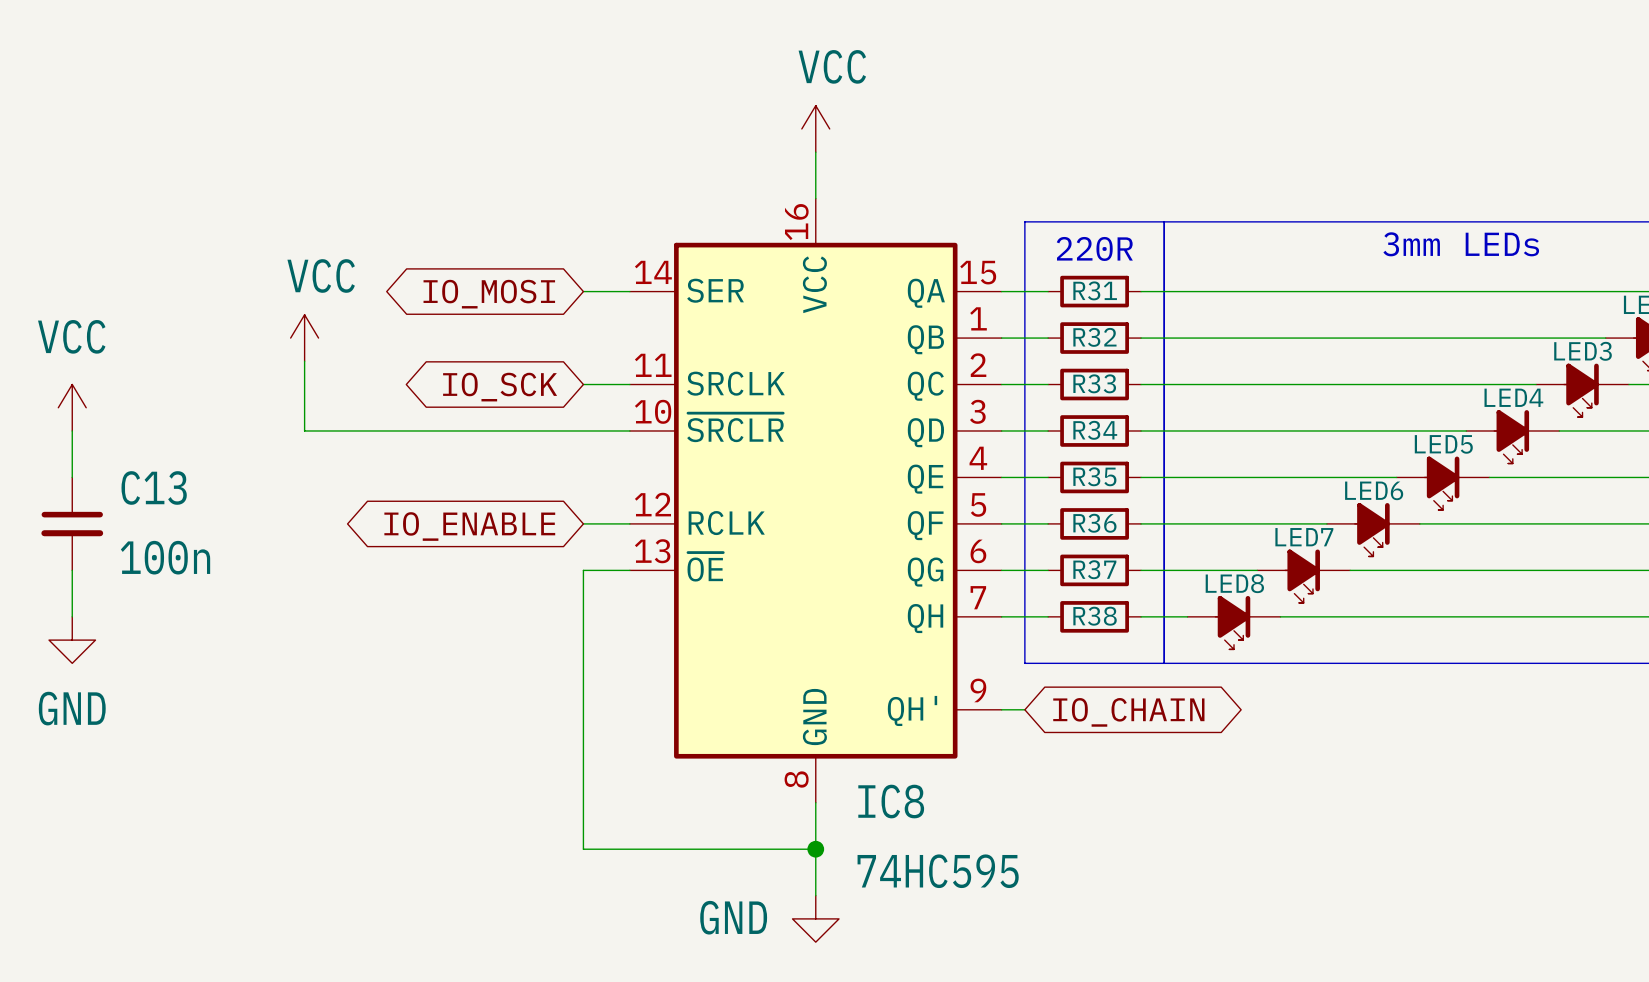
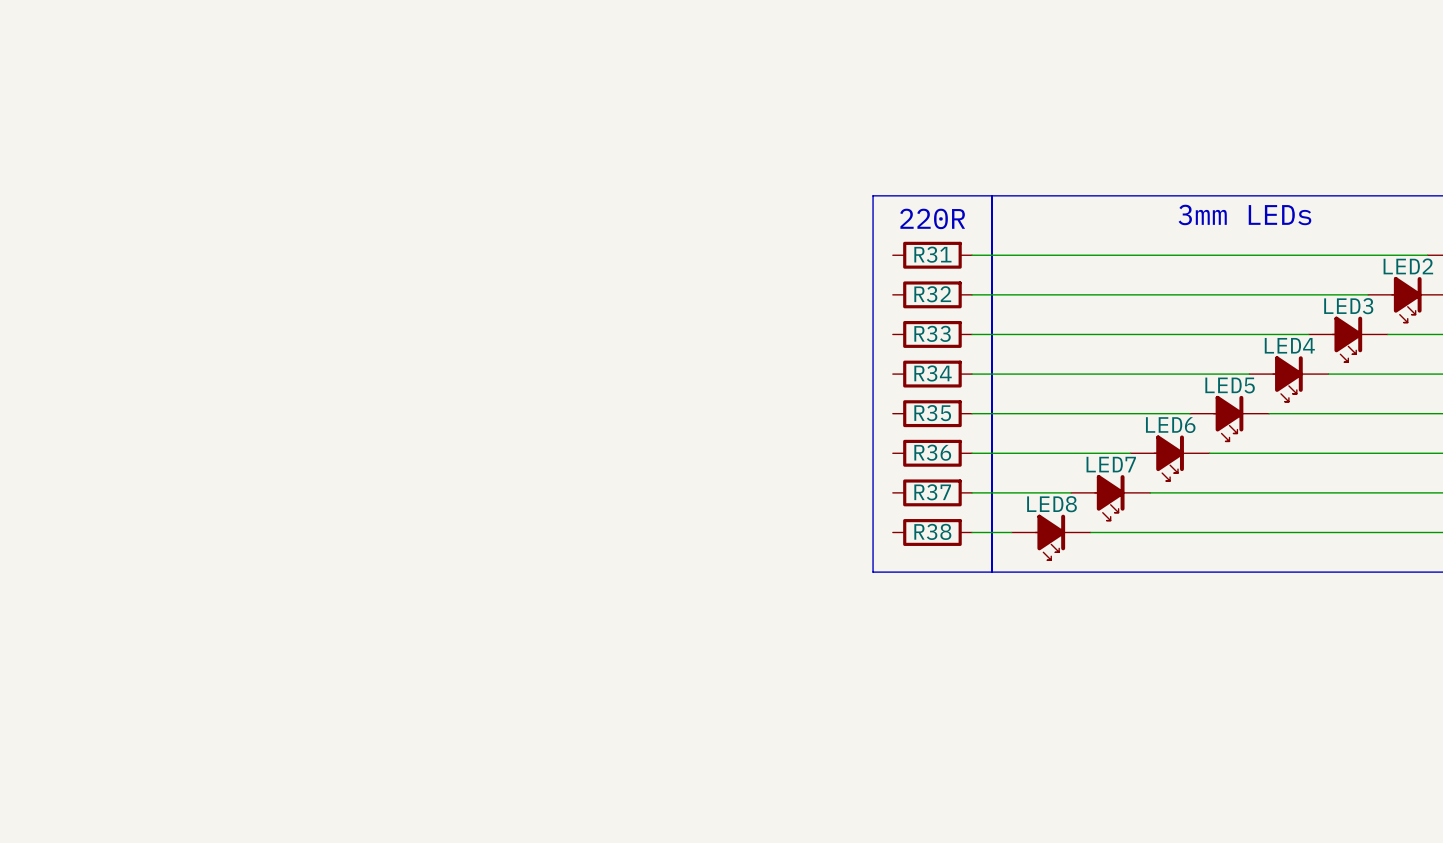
power symbol: VCC (815, 128) -> none
wire: (815, 152) (815, 198) -> none
wire: (583, 291) (629, 291) -> none
wire: (1001, 291) (1048, 291) -> none
global label: IO_MOSI (489, 294) -> none
power symbol: VCC (304, 338) -> none
wire: (1001, 338) (1048, 338) -> none
wire: (304, 361) (304, 430) (629, 430) -> none
wire: (583, 384) (629, 384) -> none
wire: (1001, 384) (1048, 384) -> none
global label: IO_SCK (500, 387) -> none
power symbol: VCC (72, 407) -> none
wire: (72, 430) (72, 477) -> none
wire: (1001, 430) (1048, 430) -> none
wire: (1001, 477) (1048, 477) -> none
IC8: 74HC595 (815, 500) -> none
C13: 100n (72, 523) -> none
wire: (583, 523) (629, 523) -> none
wire: (1001, 523) (1048, 523) -> none
global label: IO_ENABLE (469, 526) -> none
wire: (72, 570) (72, 616) -> none
wire: (629, 570) (583, 570) (583, 849) (815, 849) -> none
wire: (1001, 570) (1048, 570) -> none
wire: (1001, 616) (1048, 616) -> none
power symbol: GND (72, 640) -> none
wire: (1001, 709) (1024, 709) -> none
global label: IO_CHAIN (1128, 712) -> none
wire: (815, 802) (815, 895) -> none
junction: (815, 849) -> none
power symbol: GND (815, 918) -> none

